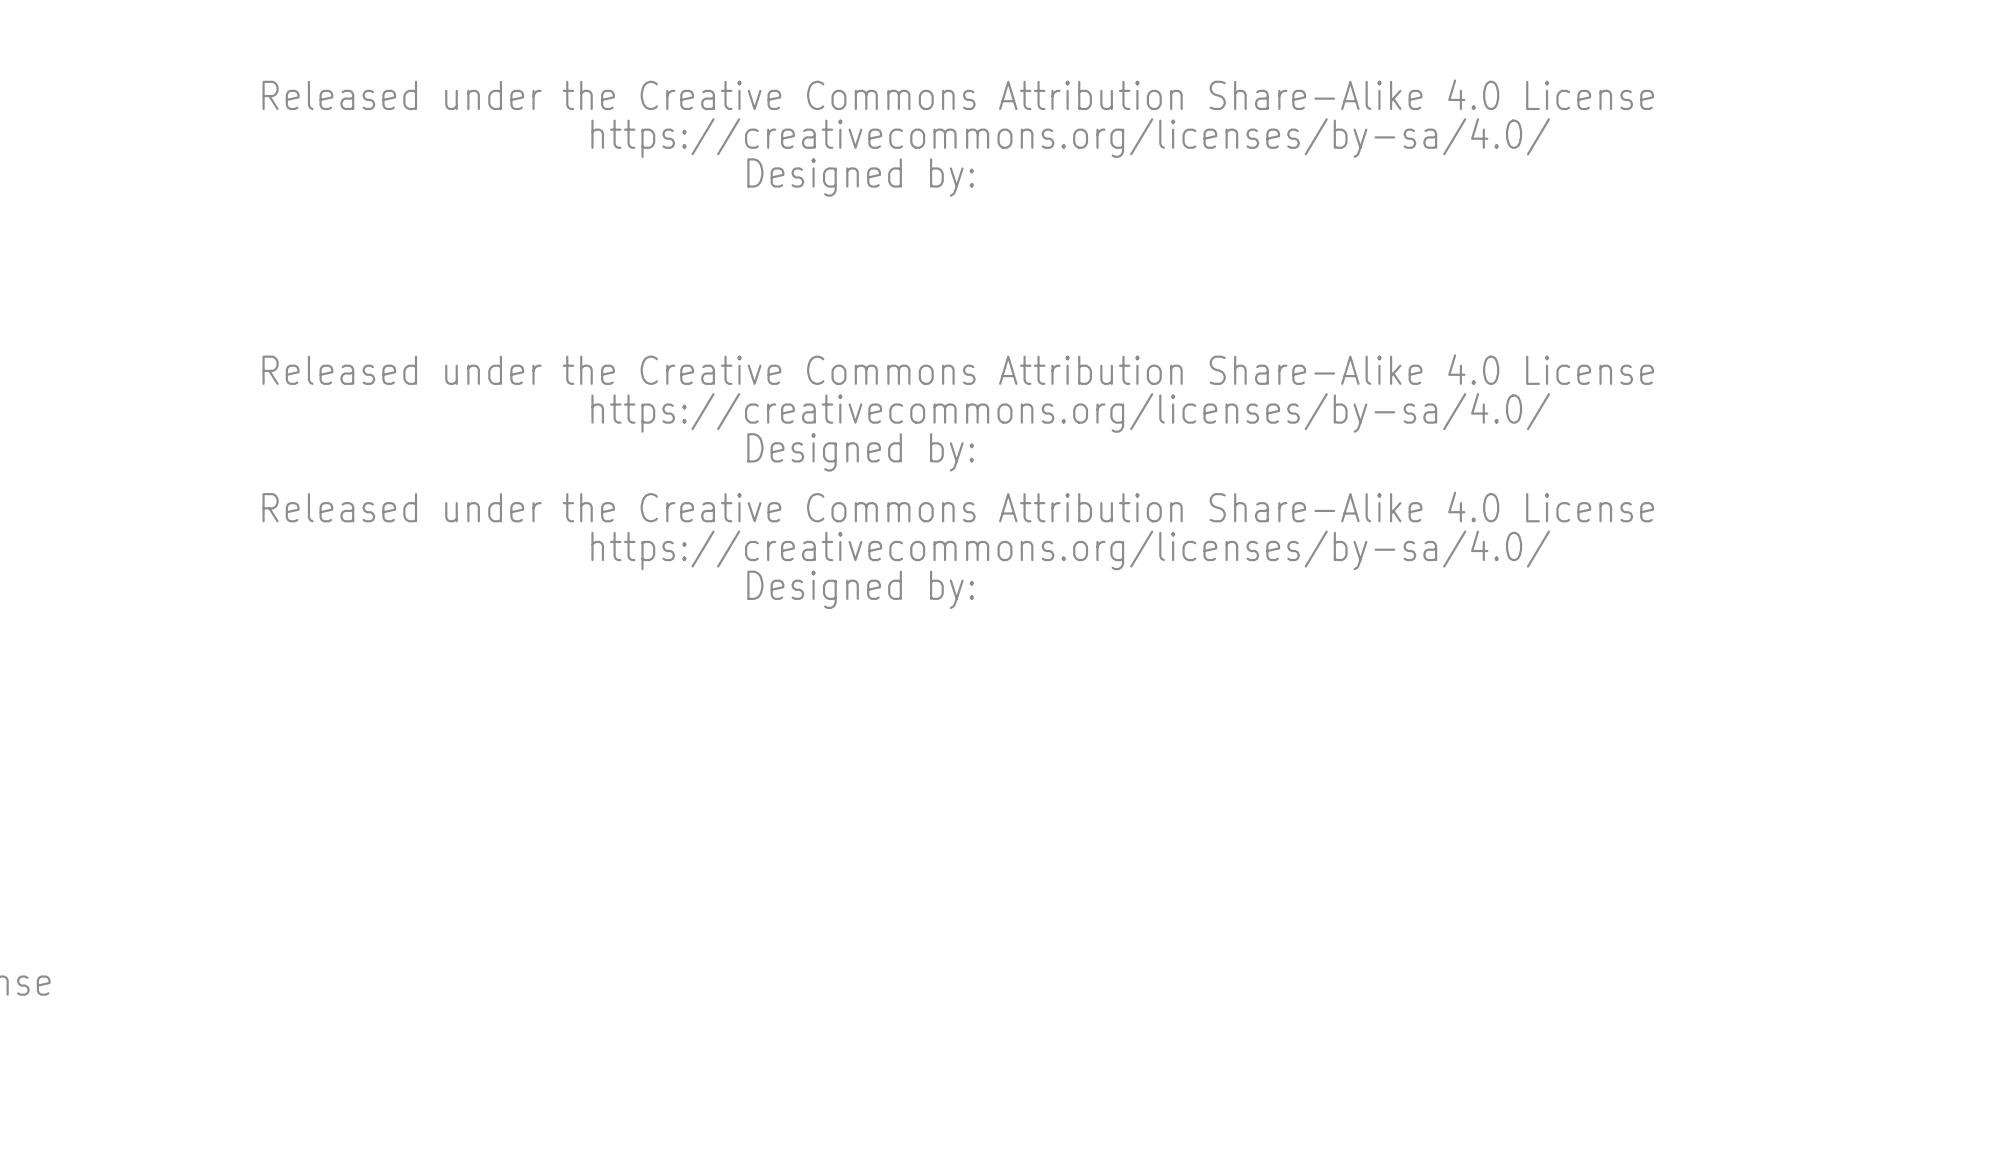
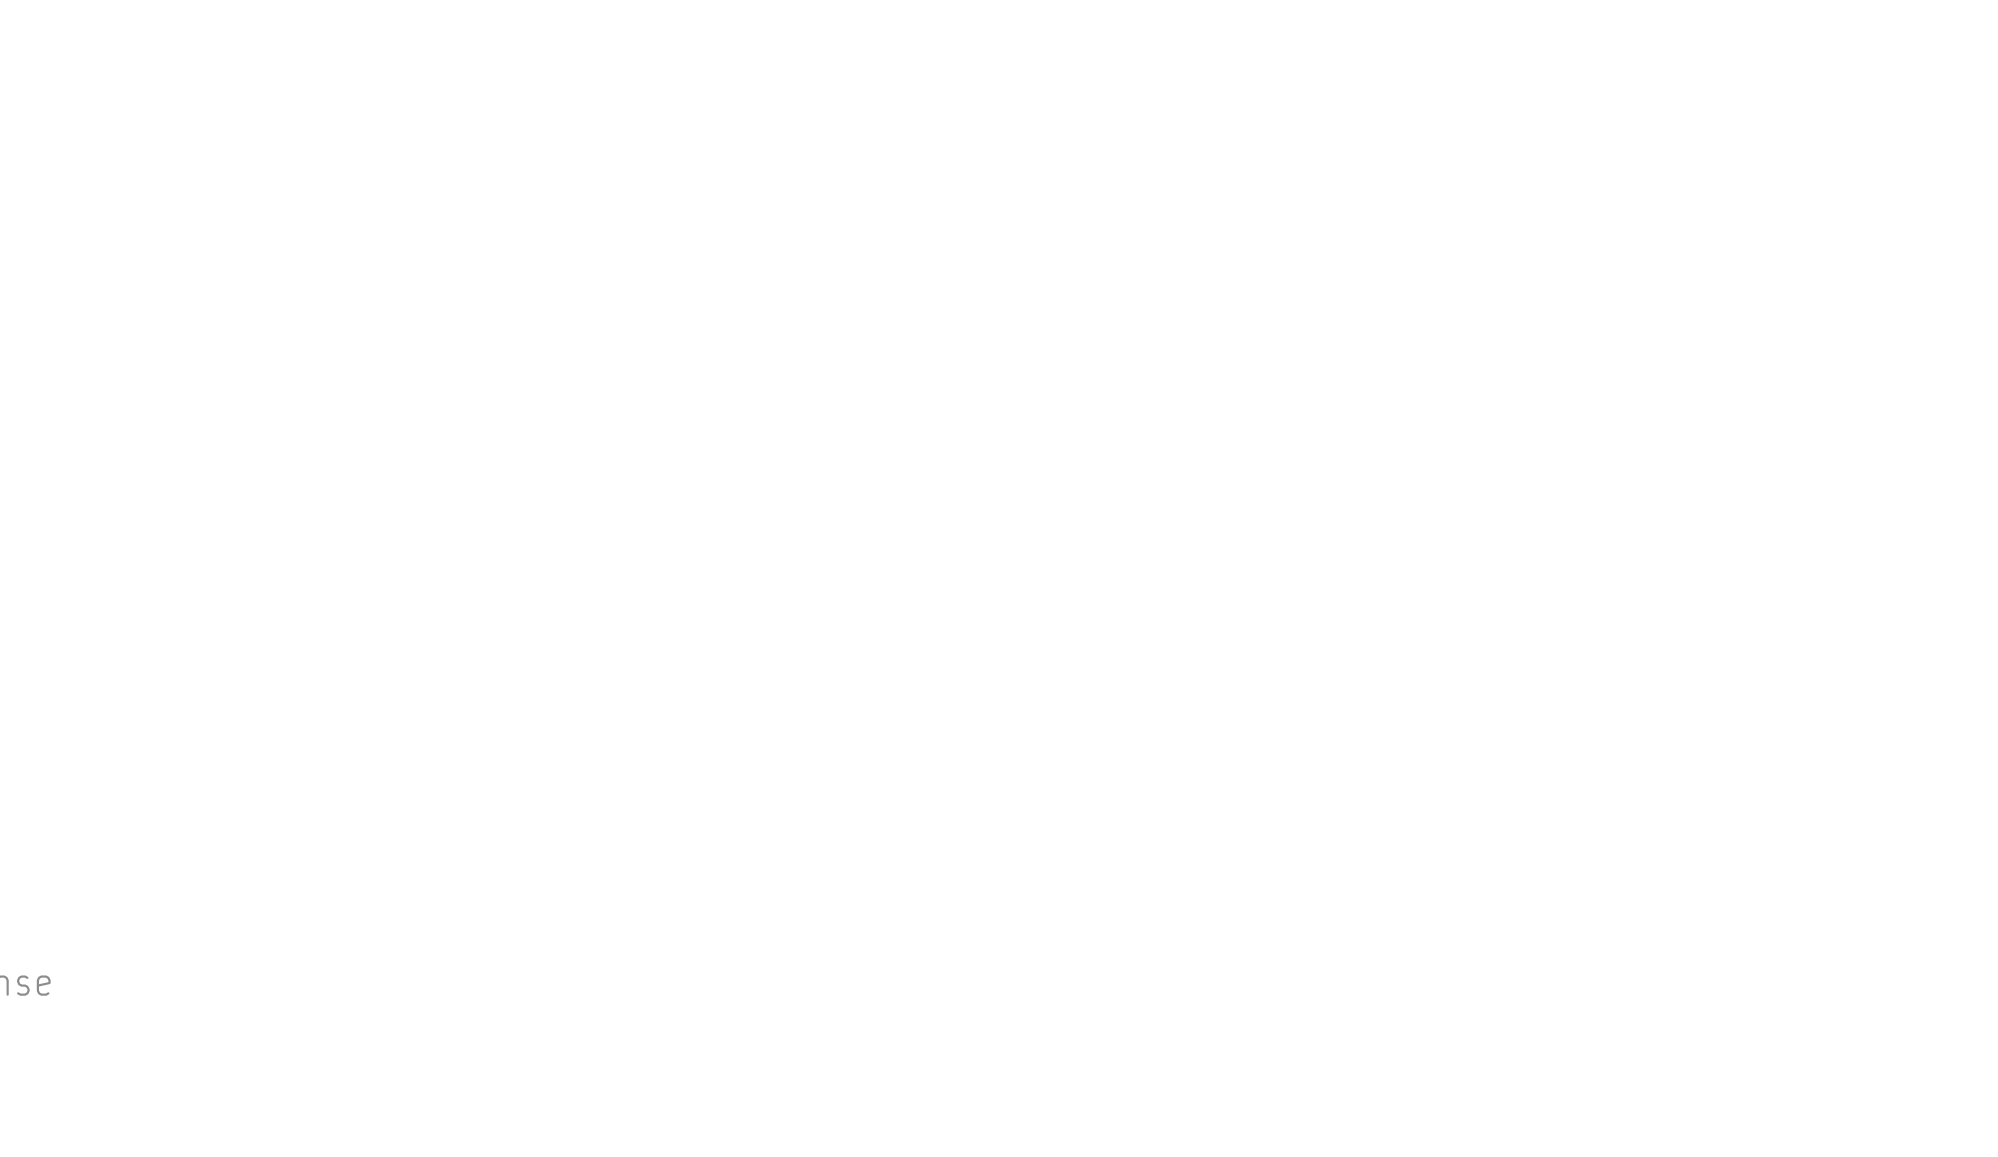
drawing: [262, 79, 1654, 197] -> none
drawing: [262, 354, 1654, 609] -> none

